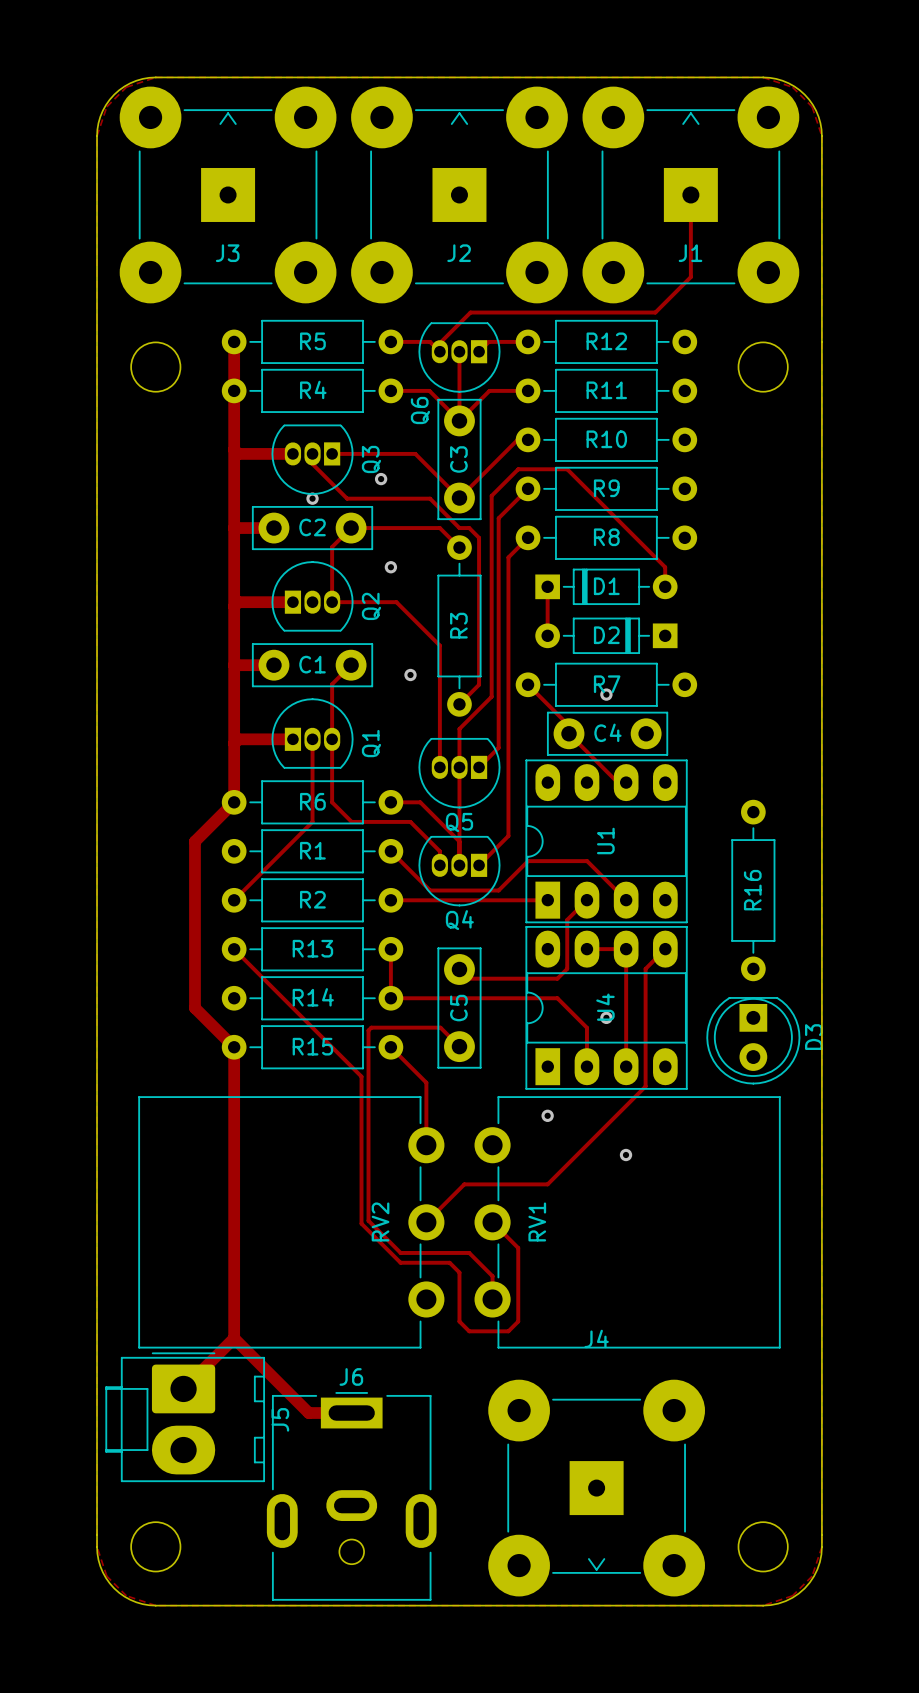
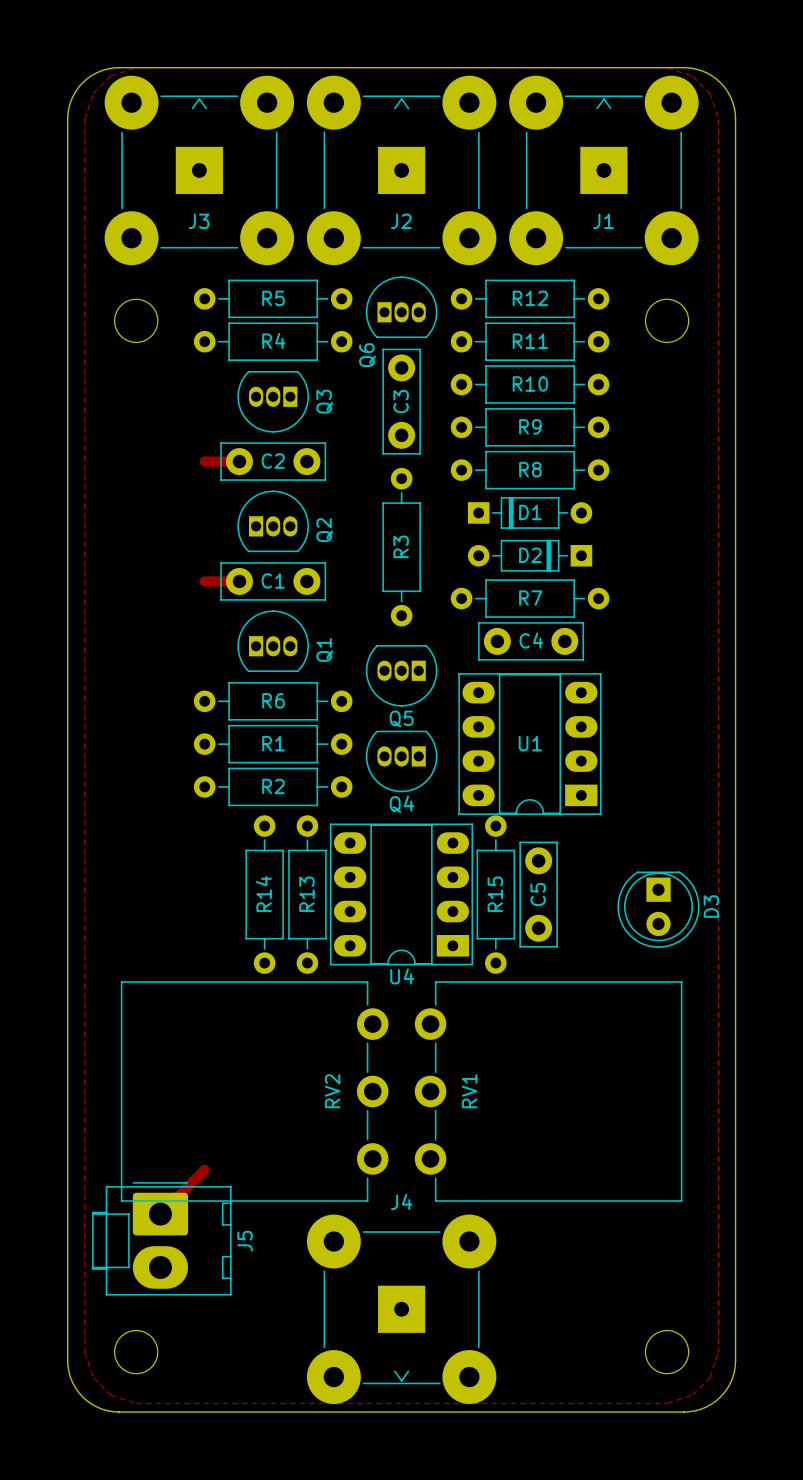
board edge: (155, 77) (136, 80) (114, 94) (100, 116) (97, 136) (97, 1546) (100, 1566) (114, 1588) (136, 1602) (155, 1605) (763, 1605) (778, 1603) (792, 1597) (809, 1582) (817, 1569) (821, 1546) (821, 136) (816, 110) (804, 94) (788, 83) (763, 77) -> (136, 67) (107, 68) (87, 78) (72, 96) (67, 119) (67, 1360) (70, 1377) (82, 1396) (96, 1406) (119, 1412) (684, 1412) (701, 1409) (716, 1400) (727, 1387) (732, 1377) (735, 1360) (735, 119) (730, 96) (716, 78) (695, 68) (667, 67)
track: (690, 194) (690, 277) (655, 312) (470, 312) (439, 343) (439, 351) (430, 341) (390, 341) -> none
track: (234, 341) (234, 802) (194, 841) (194, 1008) (234, 1047) (234, 1338) (308, 1413) (351, 1413) -> none
track: (528, 341) (488, 341) (479, 351) -> none
track: (459, 351) (459, 420) -> none
Q6 rotation: 0° (459, 357) -> 180° (401, 307)
track: (390, 390) (429, 390) (459, 420) -> none
track: (528, 390) (489, 390) (459, 420) -> none
track: (528, 439) (517, 439) (459, 498) (415, 453) (332, 453) -> none
track: (234, 449) (238, 453) (292, 453) -> none
track: (312, 453) (312, 464) (347, 498) (430, 498) (459, 528) (469, 528) (479, 537) (479, 684) (459, 704) -> none
via: (381, 479) -> none
track: (528, 488) (498, 518) (498, 747) (479, 767) -> none
via: (312, 498) -> none
track: (528, 537) (508, 557) (508, 835) (479, 865) -> none
track: (459, 547) (439, 528) (351, 528) (332, 547) (332, 602) (396, 602) (439, 645) (439, 767) -> none
via: (390, 567) -> none
track: (547, 586) (547, 635) -> none
track: (665, 586) (665, 567) (567, 469) (518, 469) (491, 495) (491, 696) (459, 728) (459, 865) -> none
track: (292, 602) (238, 602) (234, 606) -> none
track: (351, 665) (332, 684) (332, 802) (351, 821) (410, 821) (439, 851) (439, 865) -> none
via: (410, 674) -> none
track: (528, 684) (569, 725) (569, 733) (617, 782) (626, 782) -> none
via: (606, 694) -> none
track: (292, 739) (238, 739) (234, 743) -> none
track: (312, 739) (312, 821) (234, 900) -> none
track: (390, 802) (420, 802) (459, 841) -> none
U1 rotation: 0° (606, 841) -> 90° counterclockwise (529, 744)
track: (390, 851) (430, 890) (498, 890) (528, 861) (587, 861) (626, 900) -> none
R16: (753, 890) -> none
track: (390, 900) (547, 900) -> none
track: (586, 900) (567, 919) (567, 968) (557, 978) (468, 978) (459, 969) -> none
track: (234, 949) (361, 1076) (361, 1223) (400, 1262) (449, 1262) (459, 1272) (459, 1321) (469, 1331) (508, 1331) (518, 1321) (518, 1248) (492, 1222) -> none
R13 rotation: 0° (312, 949) -> 90° clockwise (307, 894)
track: (390, 949) (390, 998) (557, 998) (586, 1027) (586, 1066) -> none
track: (586, 949) (626, 949) (626, 1066) -> none
track: (665, 949) (645, 968) (645, 1086) (547, 1184) (464, 1184) (426, 1222) -> none
R14 rotation: 0° (312, 998) -> 90° clockwise (264, 894)
U4 name position: U4 (605, 1007) -> U4 (402, 976)
U4 rotation: 0° (606, 1007) -> 90° counterclockwise (401, 894)
U4 position: (606, 1007) -> (401, 894)
C5 position: (459, 1008) -> (538, 894)
via: (606, 1017) -> none
track: (459, 1046) (440, 1027) (371, 1027) (368, 1030) (368, 1220) (400, 1252) (469, 1252) (492, 1276) (492, 1299) -> none
R15 rotation: 0° (312, 1047) -> 90° clockwise (495, 894)
R15 position: (312, 1047) -> (495, 894)
track: (390, 1047) (426, 1082) (426, 1145) -> none
via: (547, 1115) -> none
via: (626, 1155) -> none
RV2 position: (291, 1222) -> (254, 1091)
RV1 position: (627, 1222) -> (548, 1091)
J4 name position: J4 (596, 1338) -> J4 (401, 1201)
J4 position: (596, 1488) -> (401, 1309)
J6: (351, 1496) -> none

